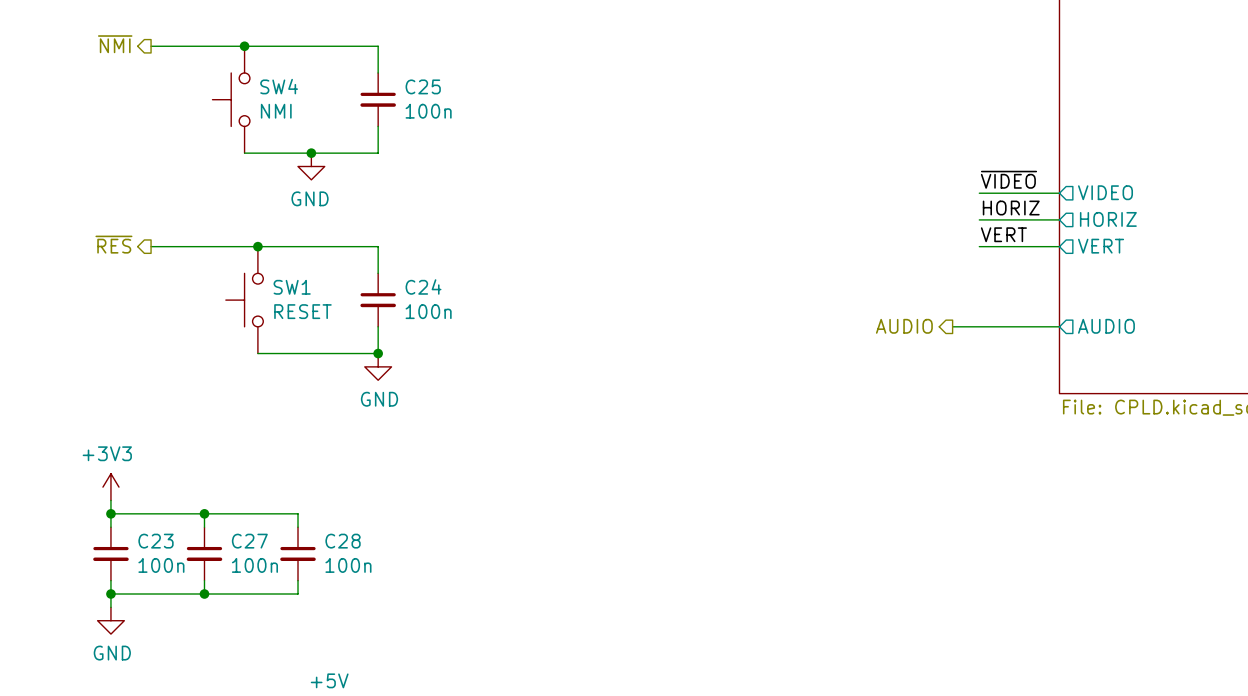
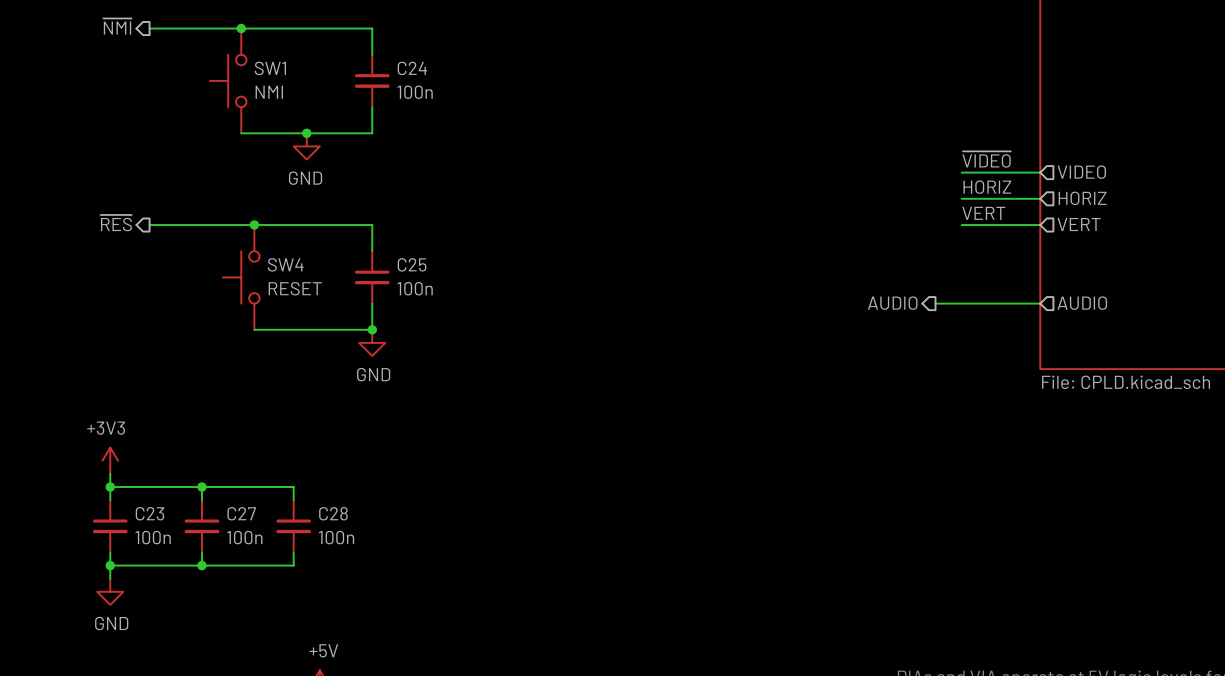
SW4 name: SW4 (279, 86) -> SW1 (270, 68)
C25 name: C25 (423, 86) -> C24 (412, 68)
C24 name: C24 (423, 286) -> C25 (412, 264)
SW1 name: SW1 (292, 287) -> SW4 (285, 264)

